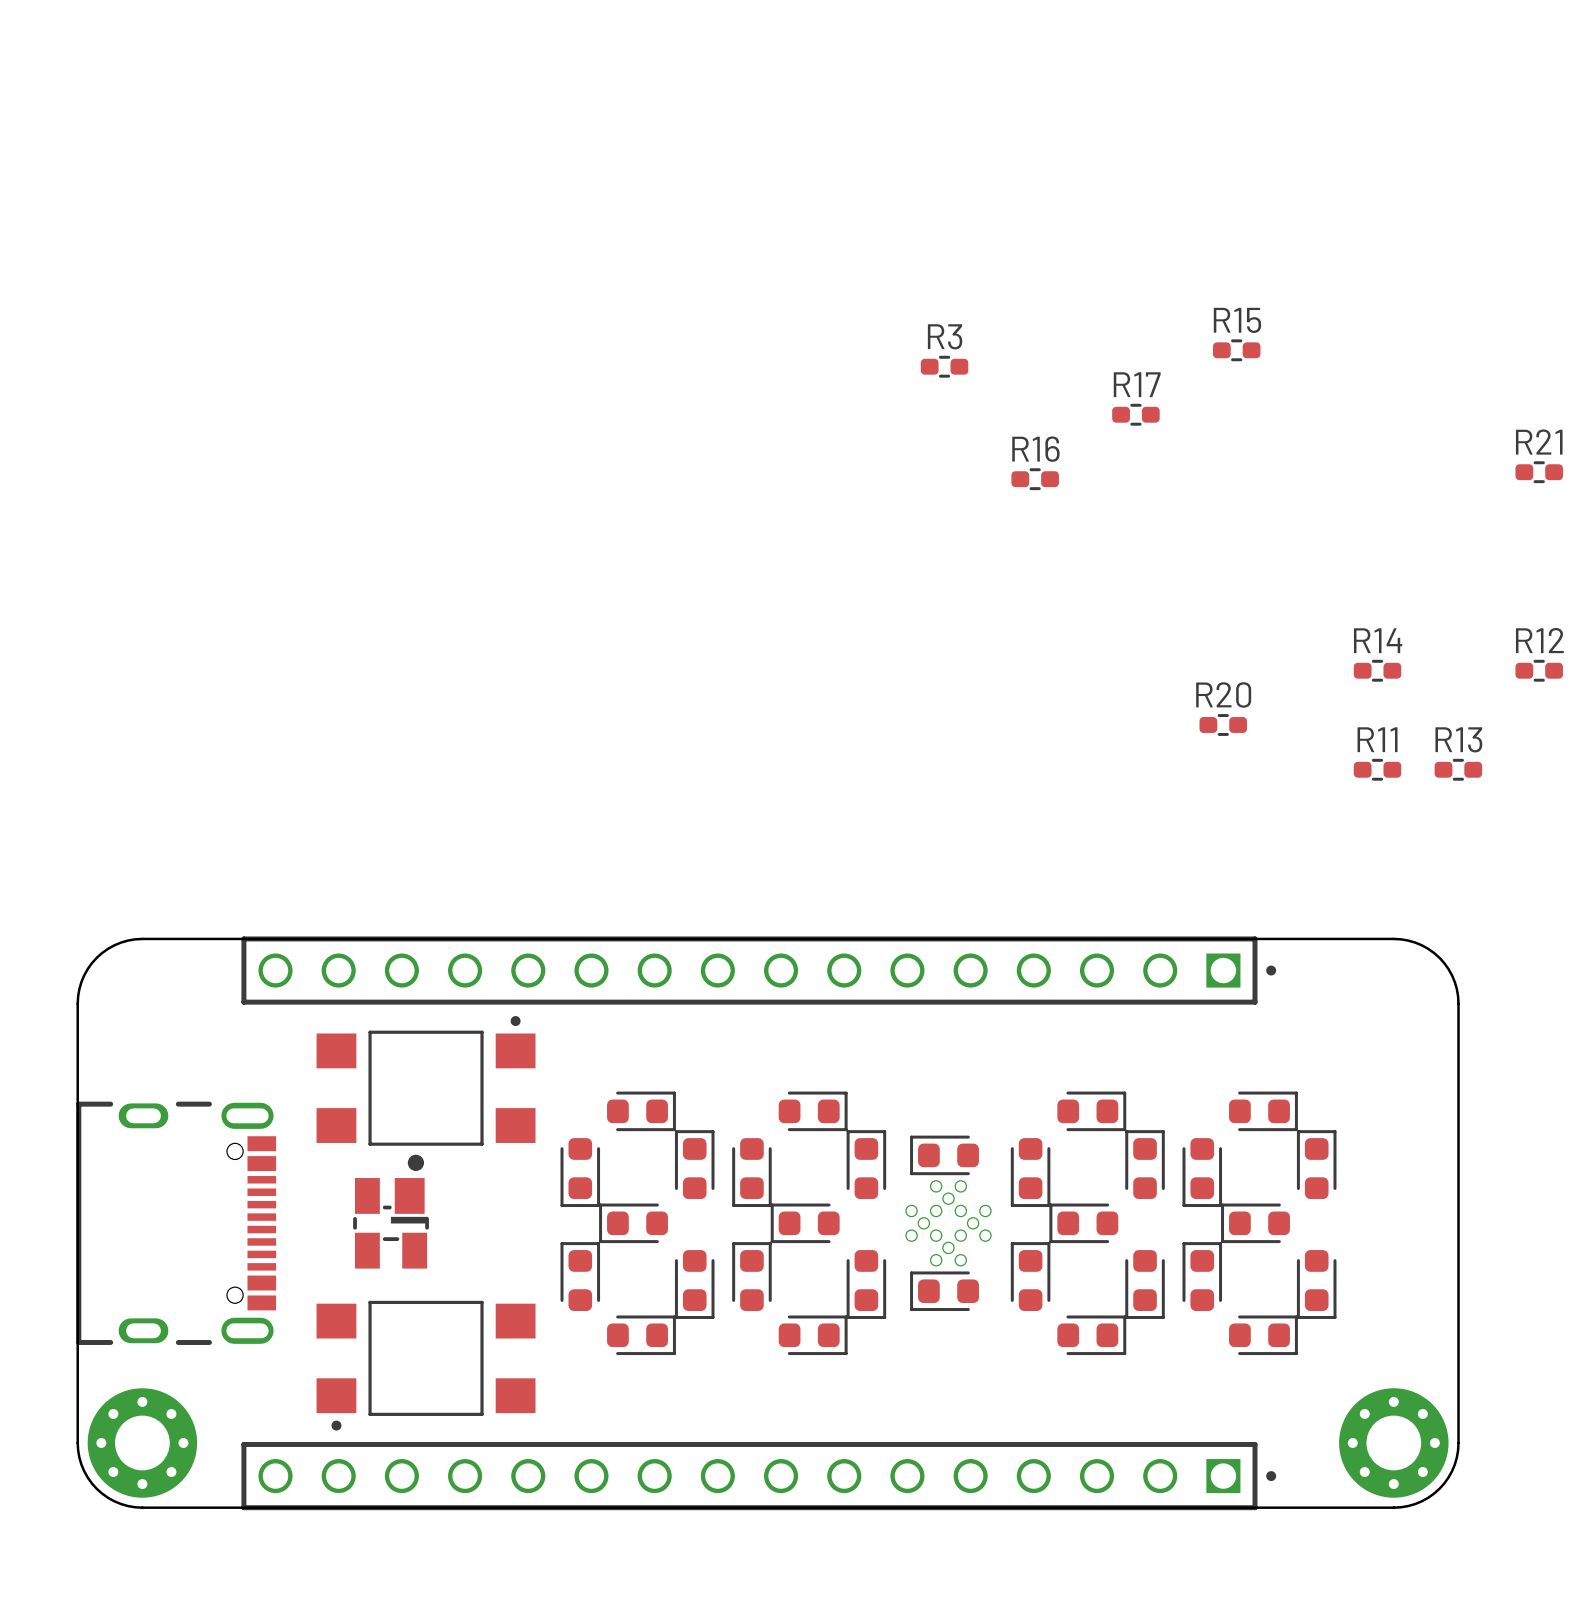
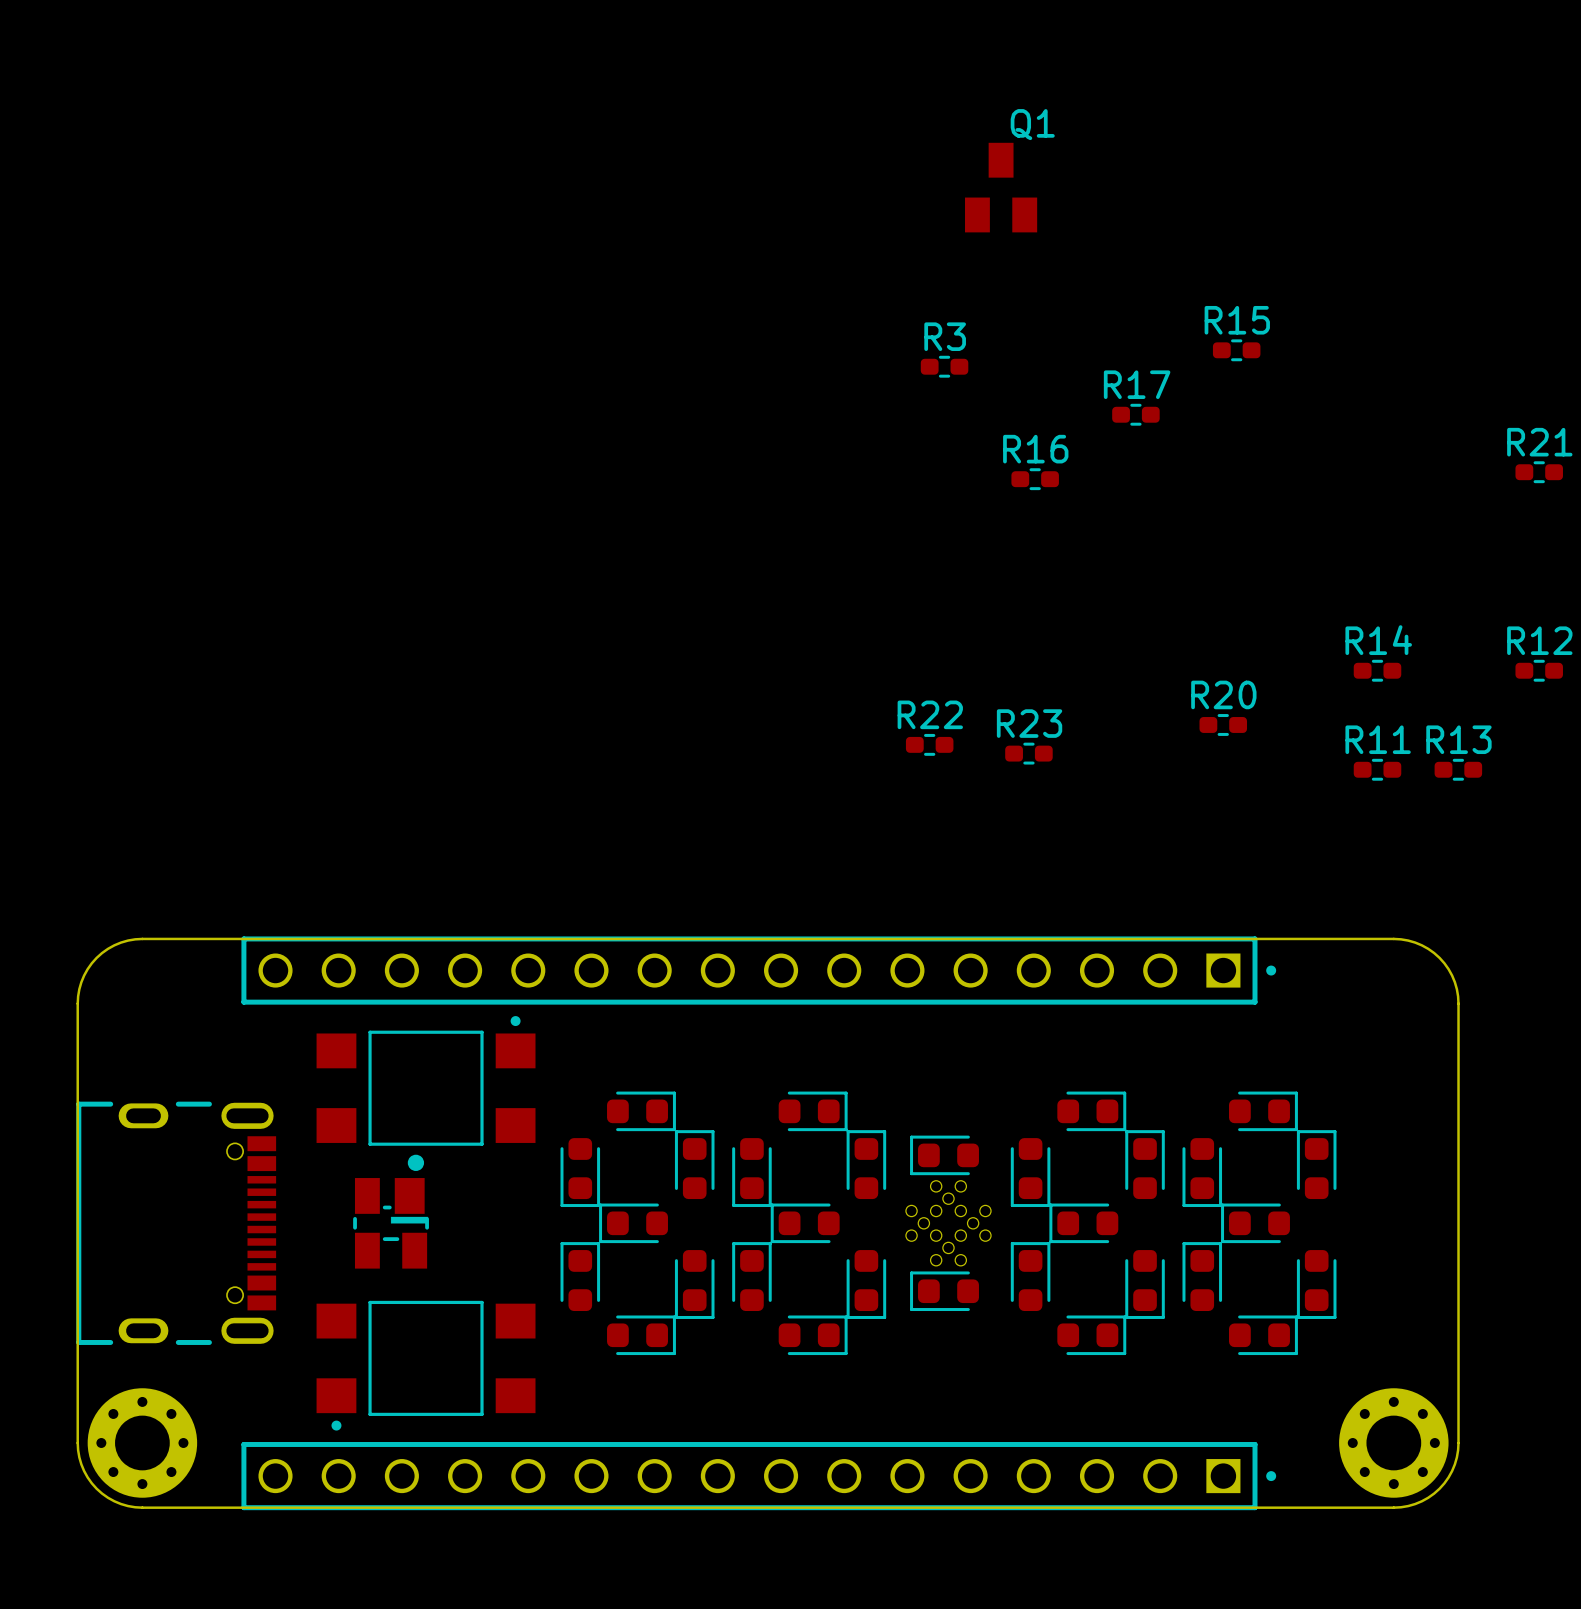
Q1: none -> (1001, 187)
R22: none -> (929, 744)
R23: none -> (1028, 753)

